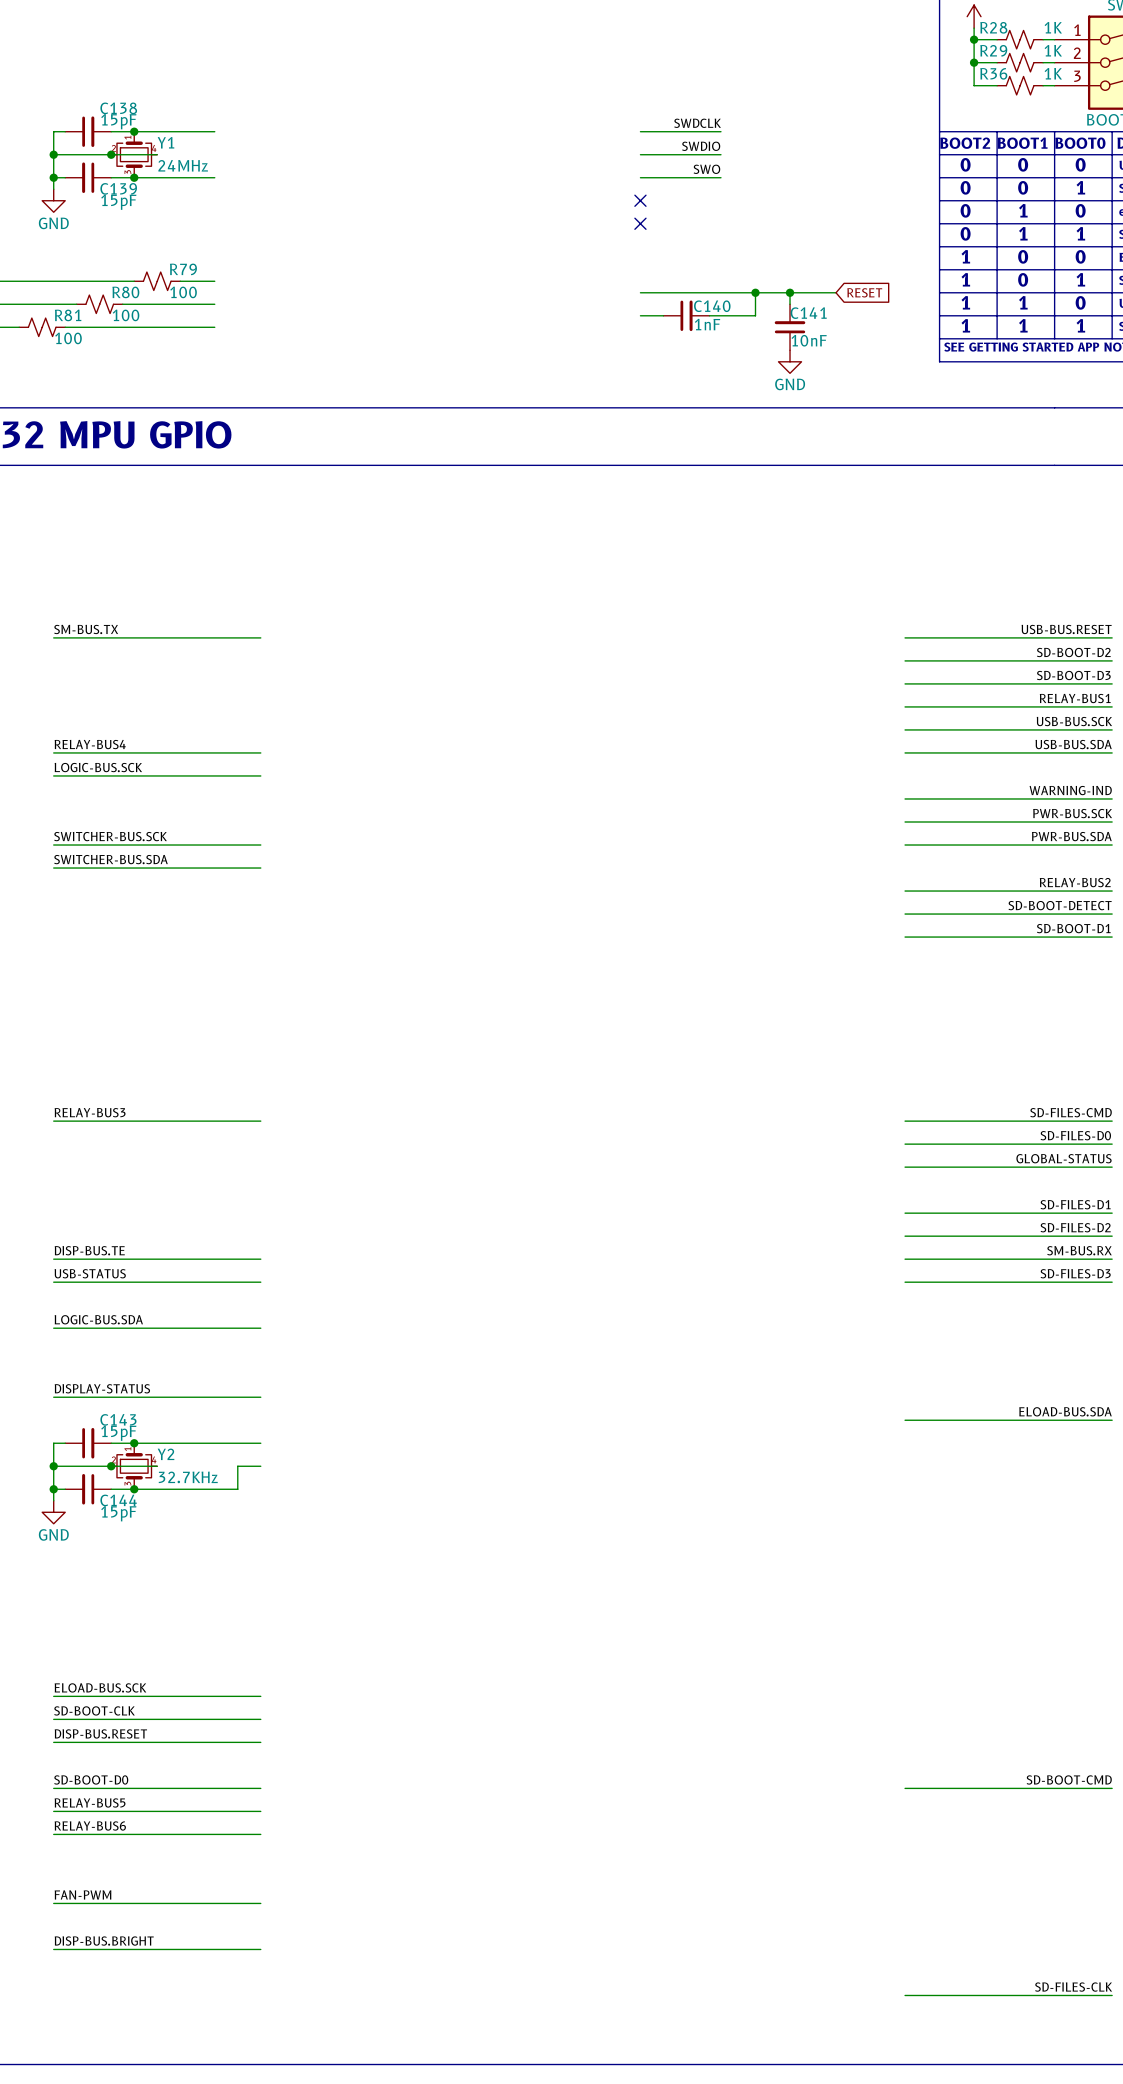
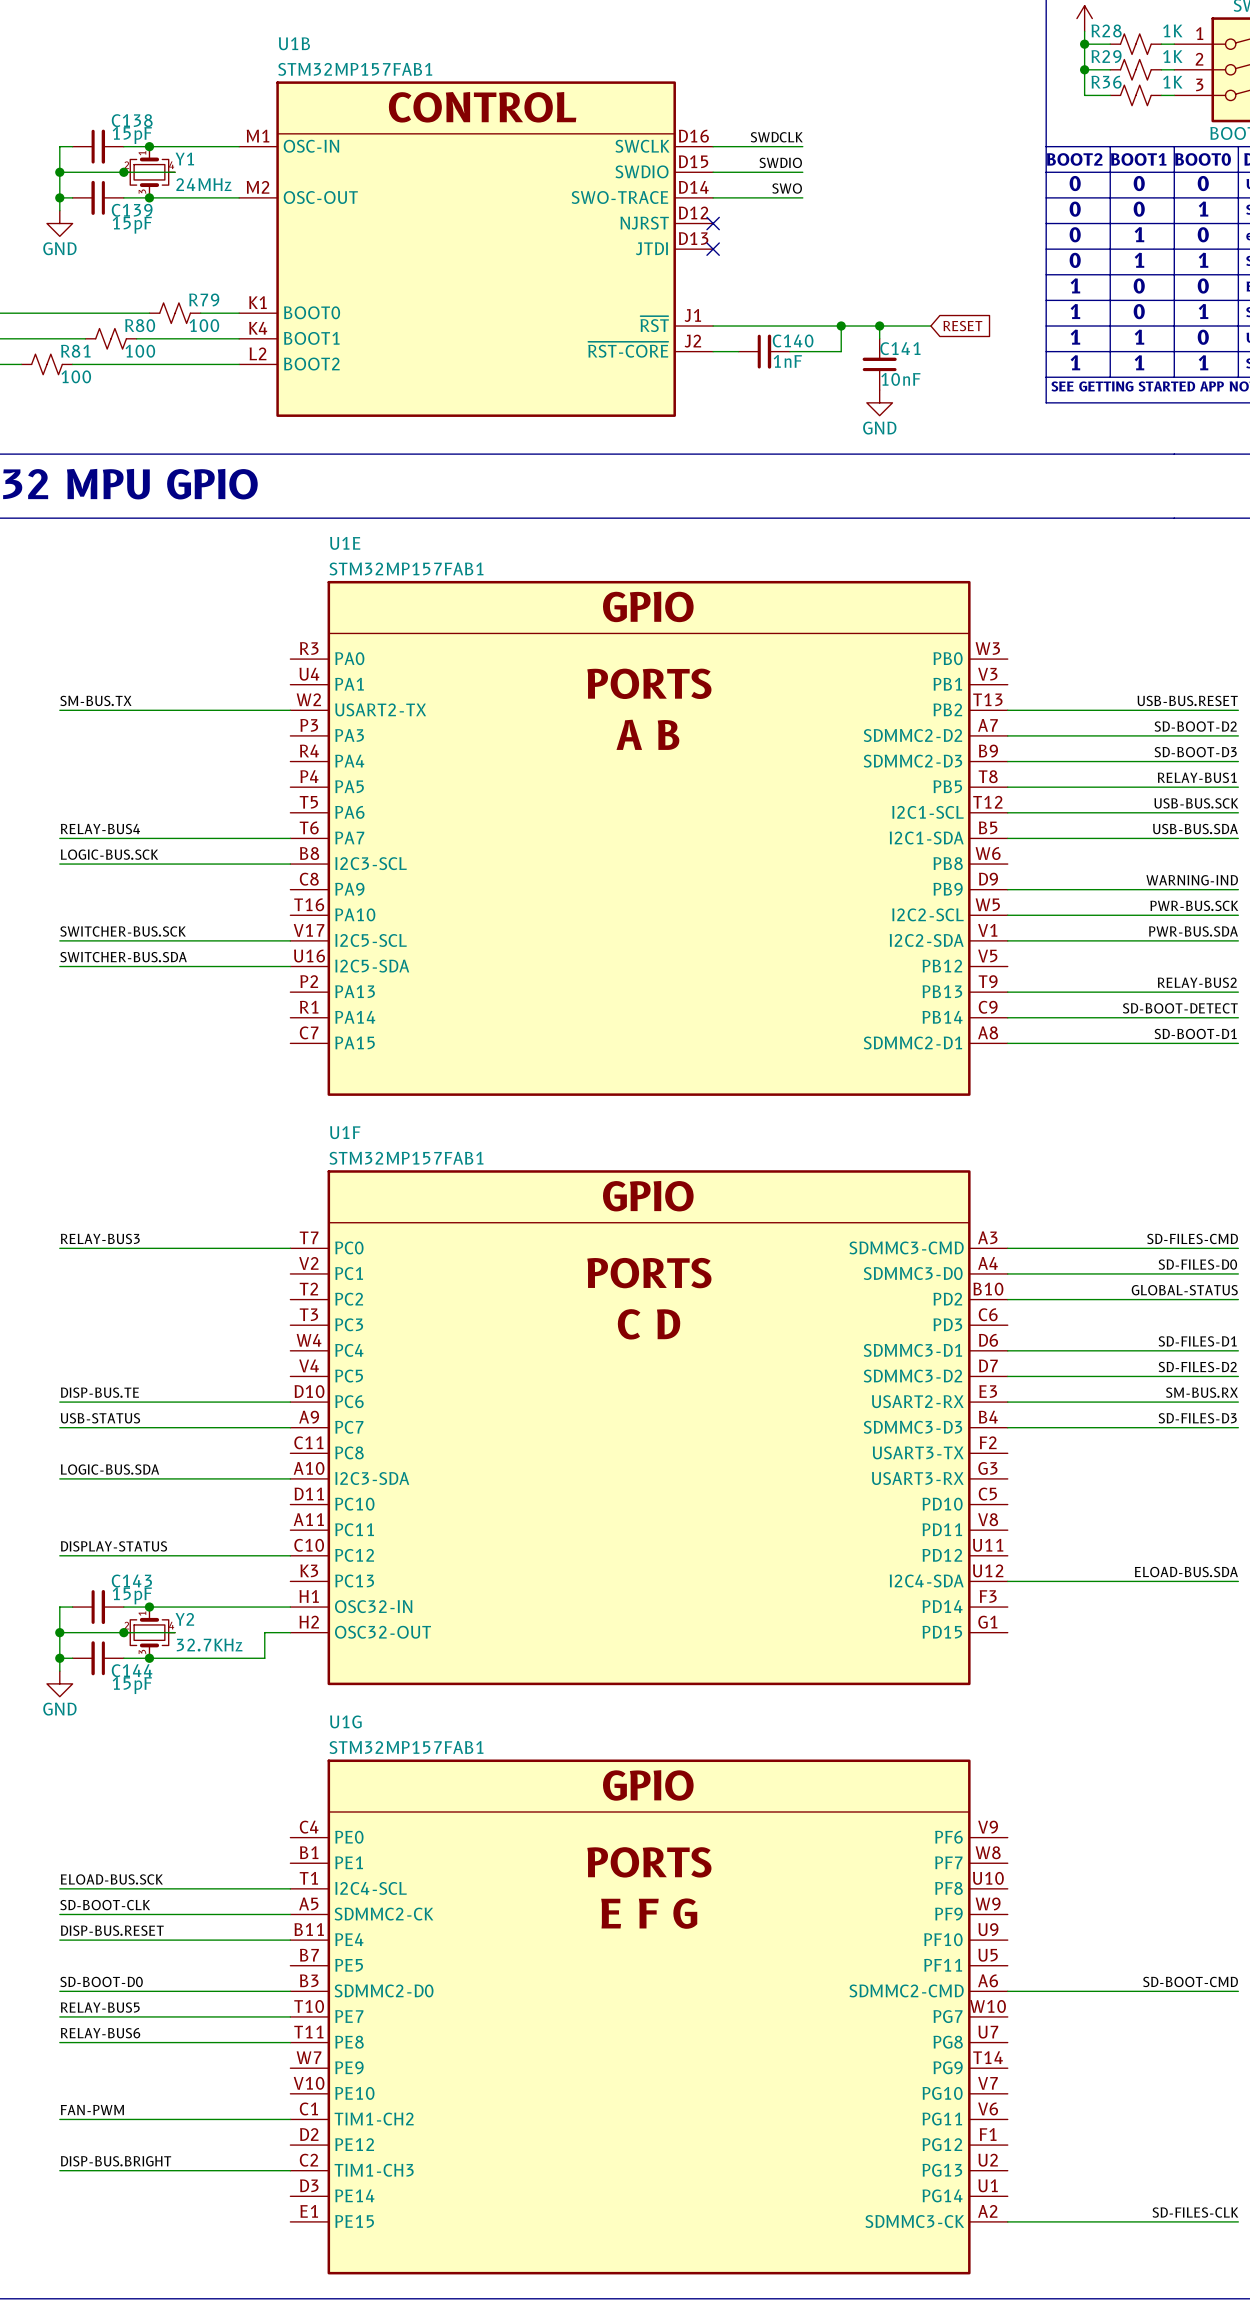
U1B: none -> STM32MP157FAB1 (476, 249)
U1E: none -> STM32MP157FAB1 (649, 838)
U1F: none -> STM32MP157FAB1 (649, 1427)
U1G: none -> STM32MP157FAB1 (649, 2016)

